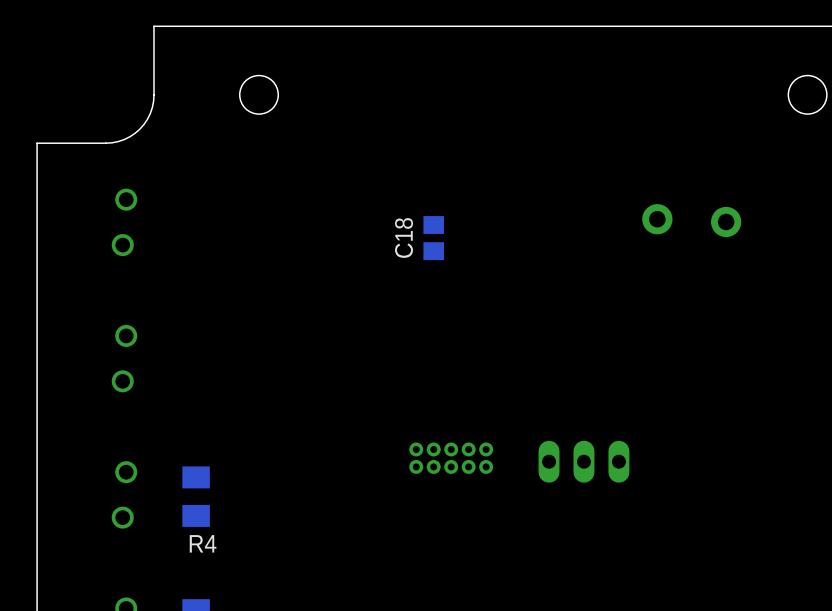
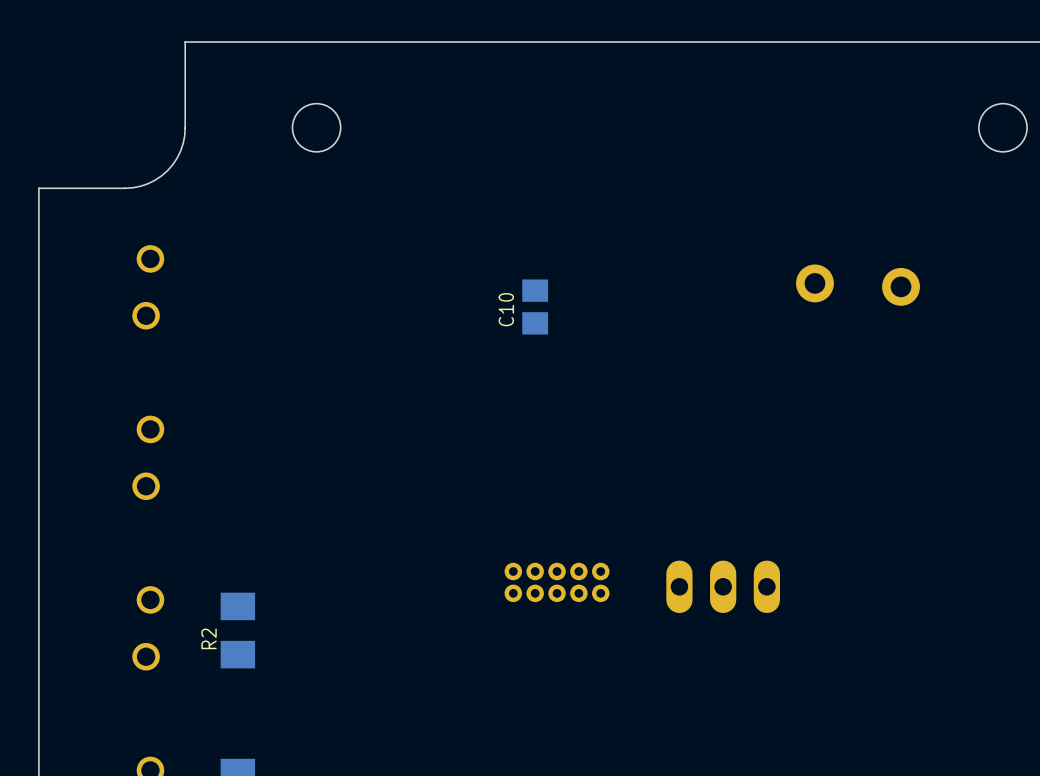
C18 name: C18 (404, 238) -> C10 (506, 309)
R4 name: R4 (203, 543) -> R2 (209, 638)

